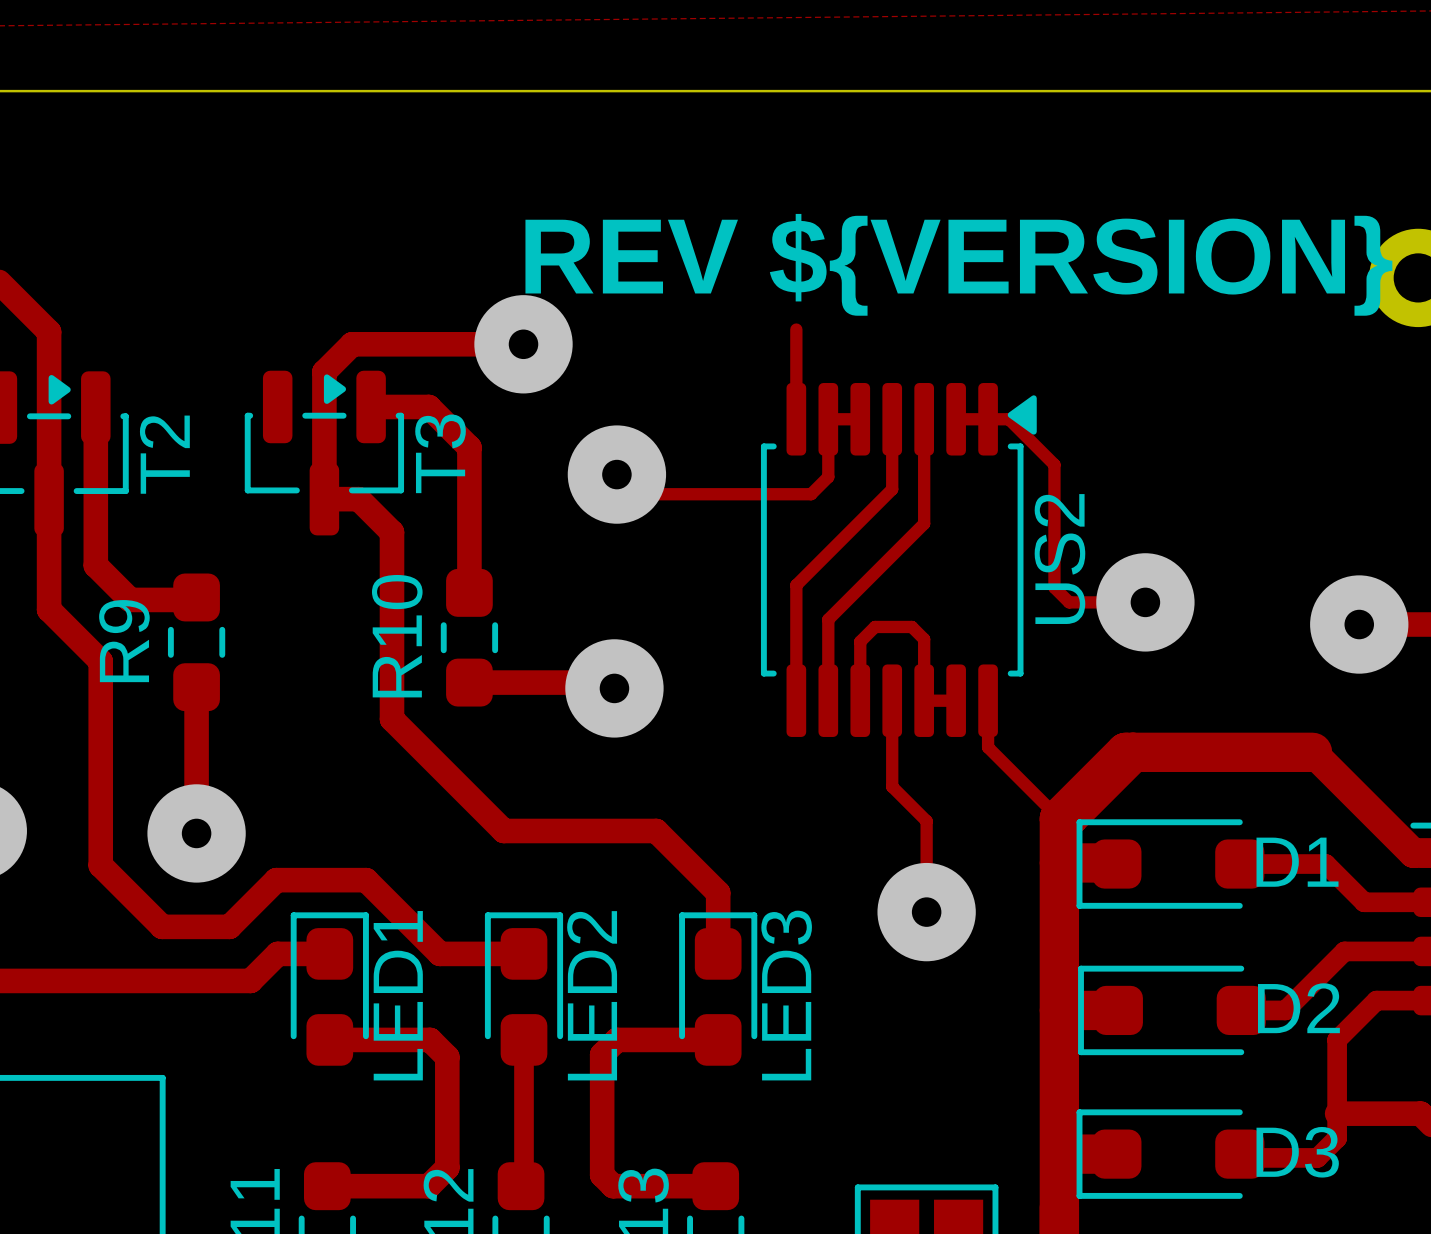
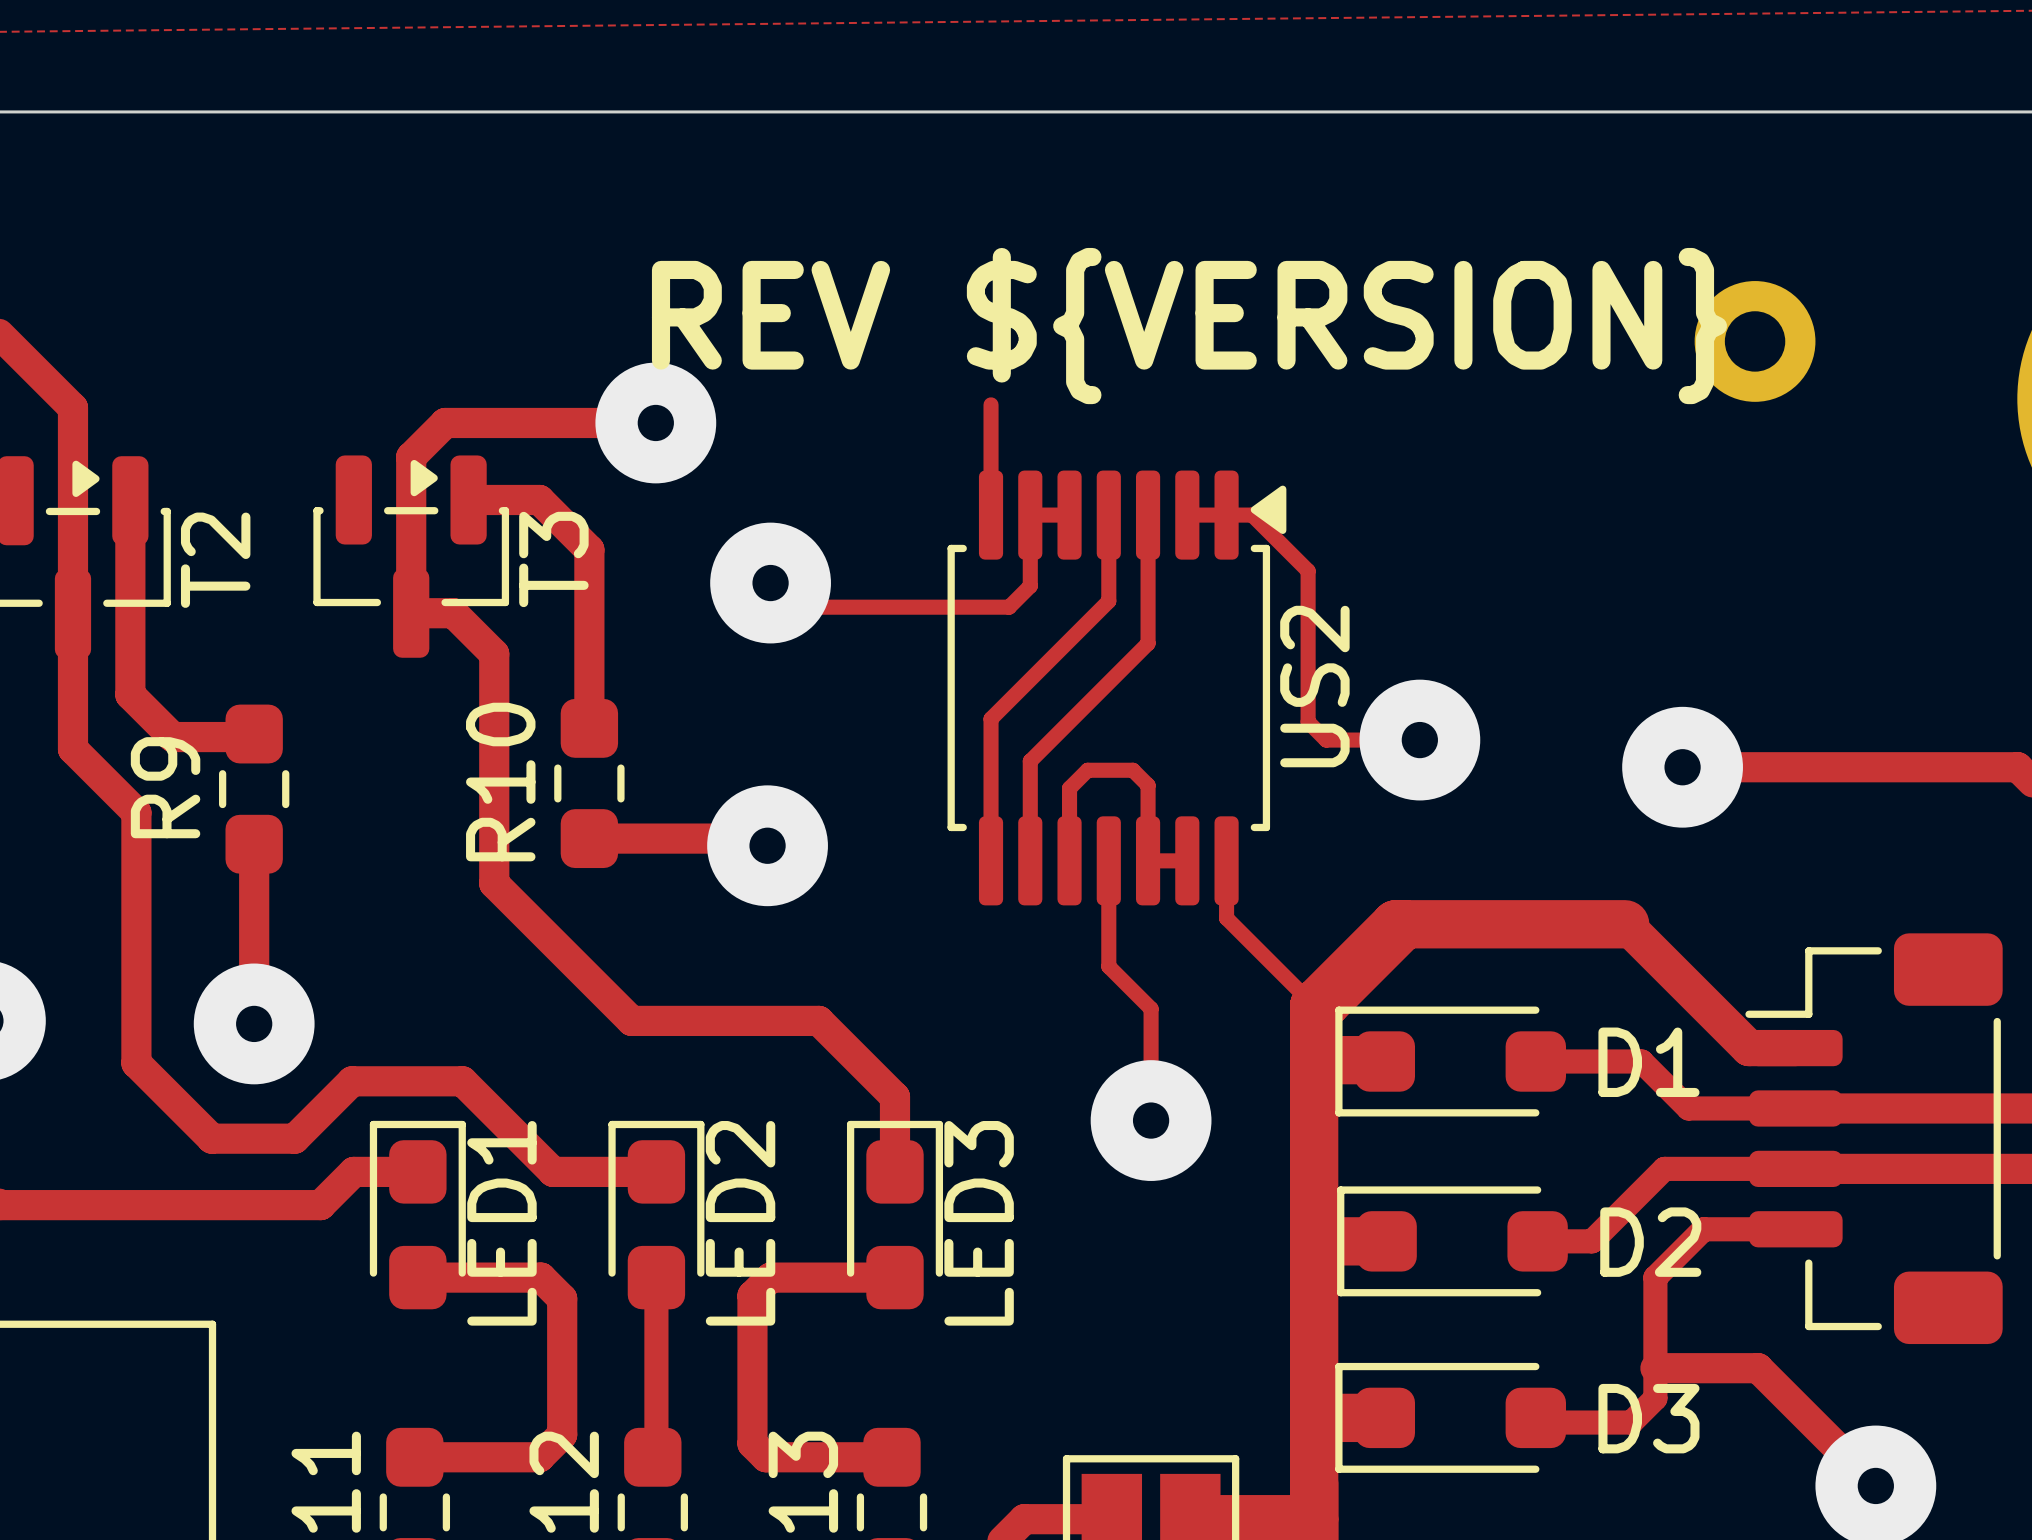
D1 name position: D1 (1297, 862) -> D1 (1648, 1062)
D2 name position: D2 (1298, 1008) -> D2 (1650, 1242)
D3 name position: D3 (1297, 1152) -> D3 (1648, 1418)

